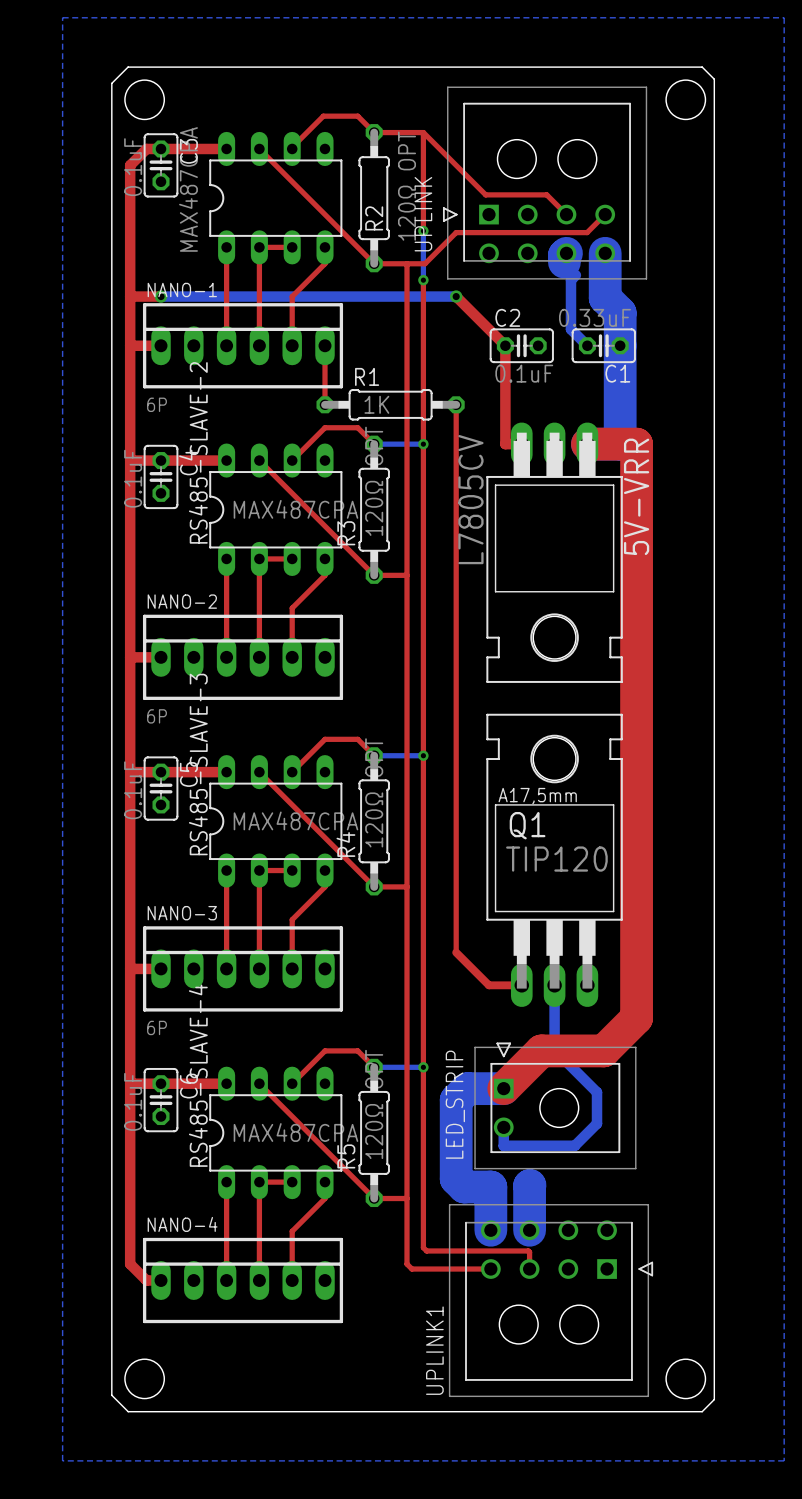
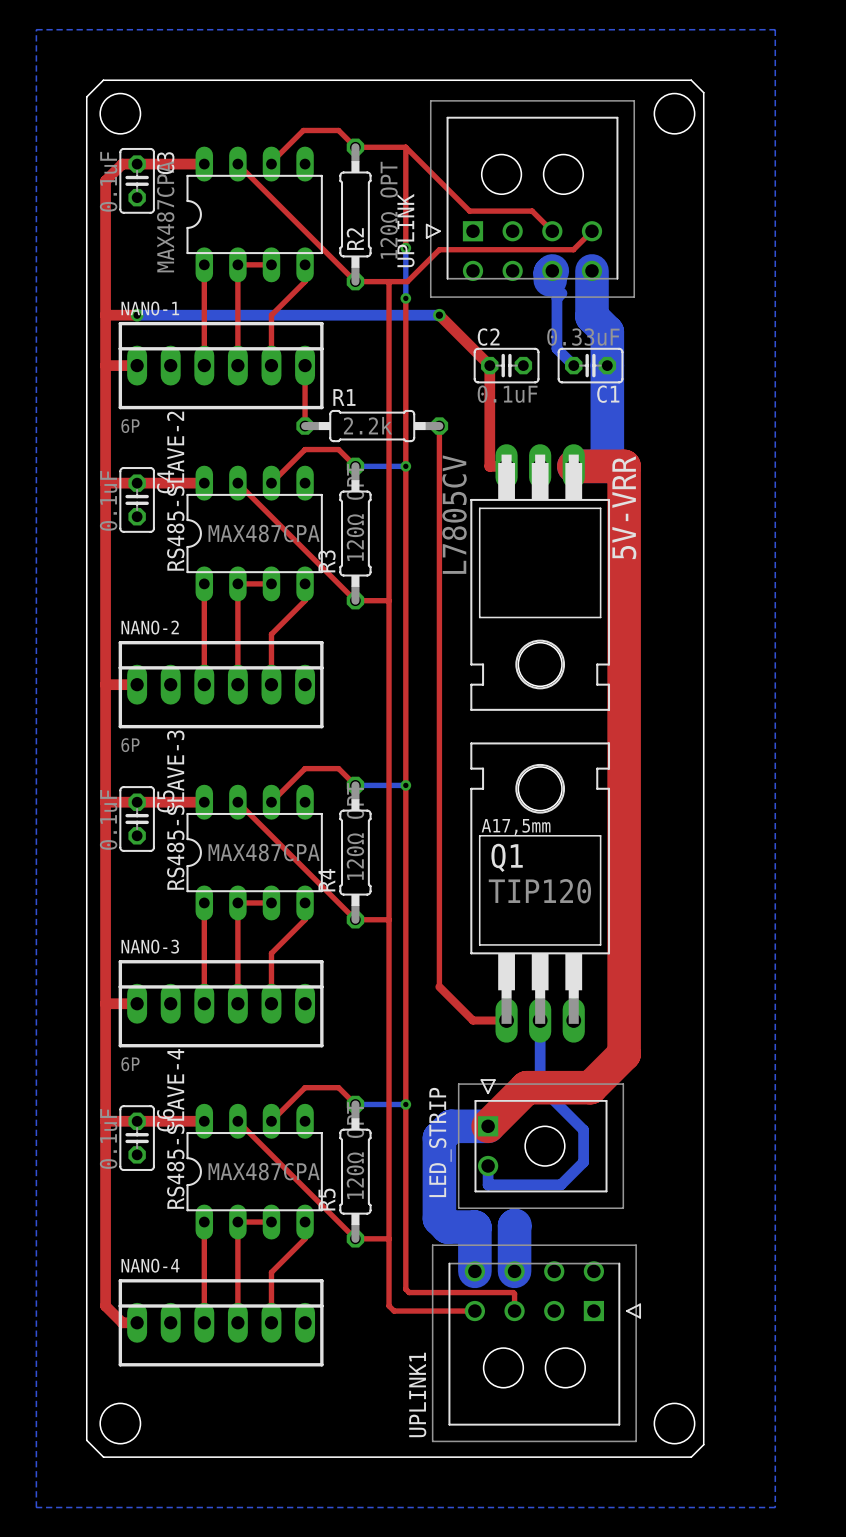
R1 value: 1K (376, 404) -> 2.2k (367, 425)

